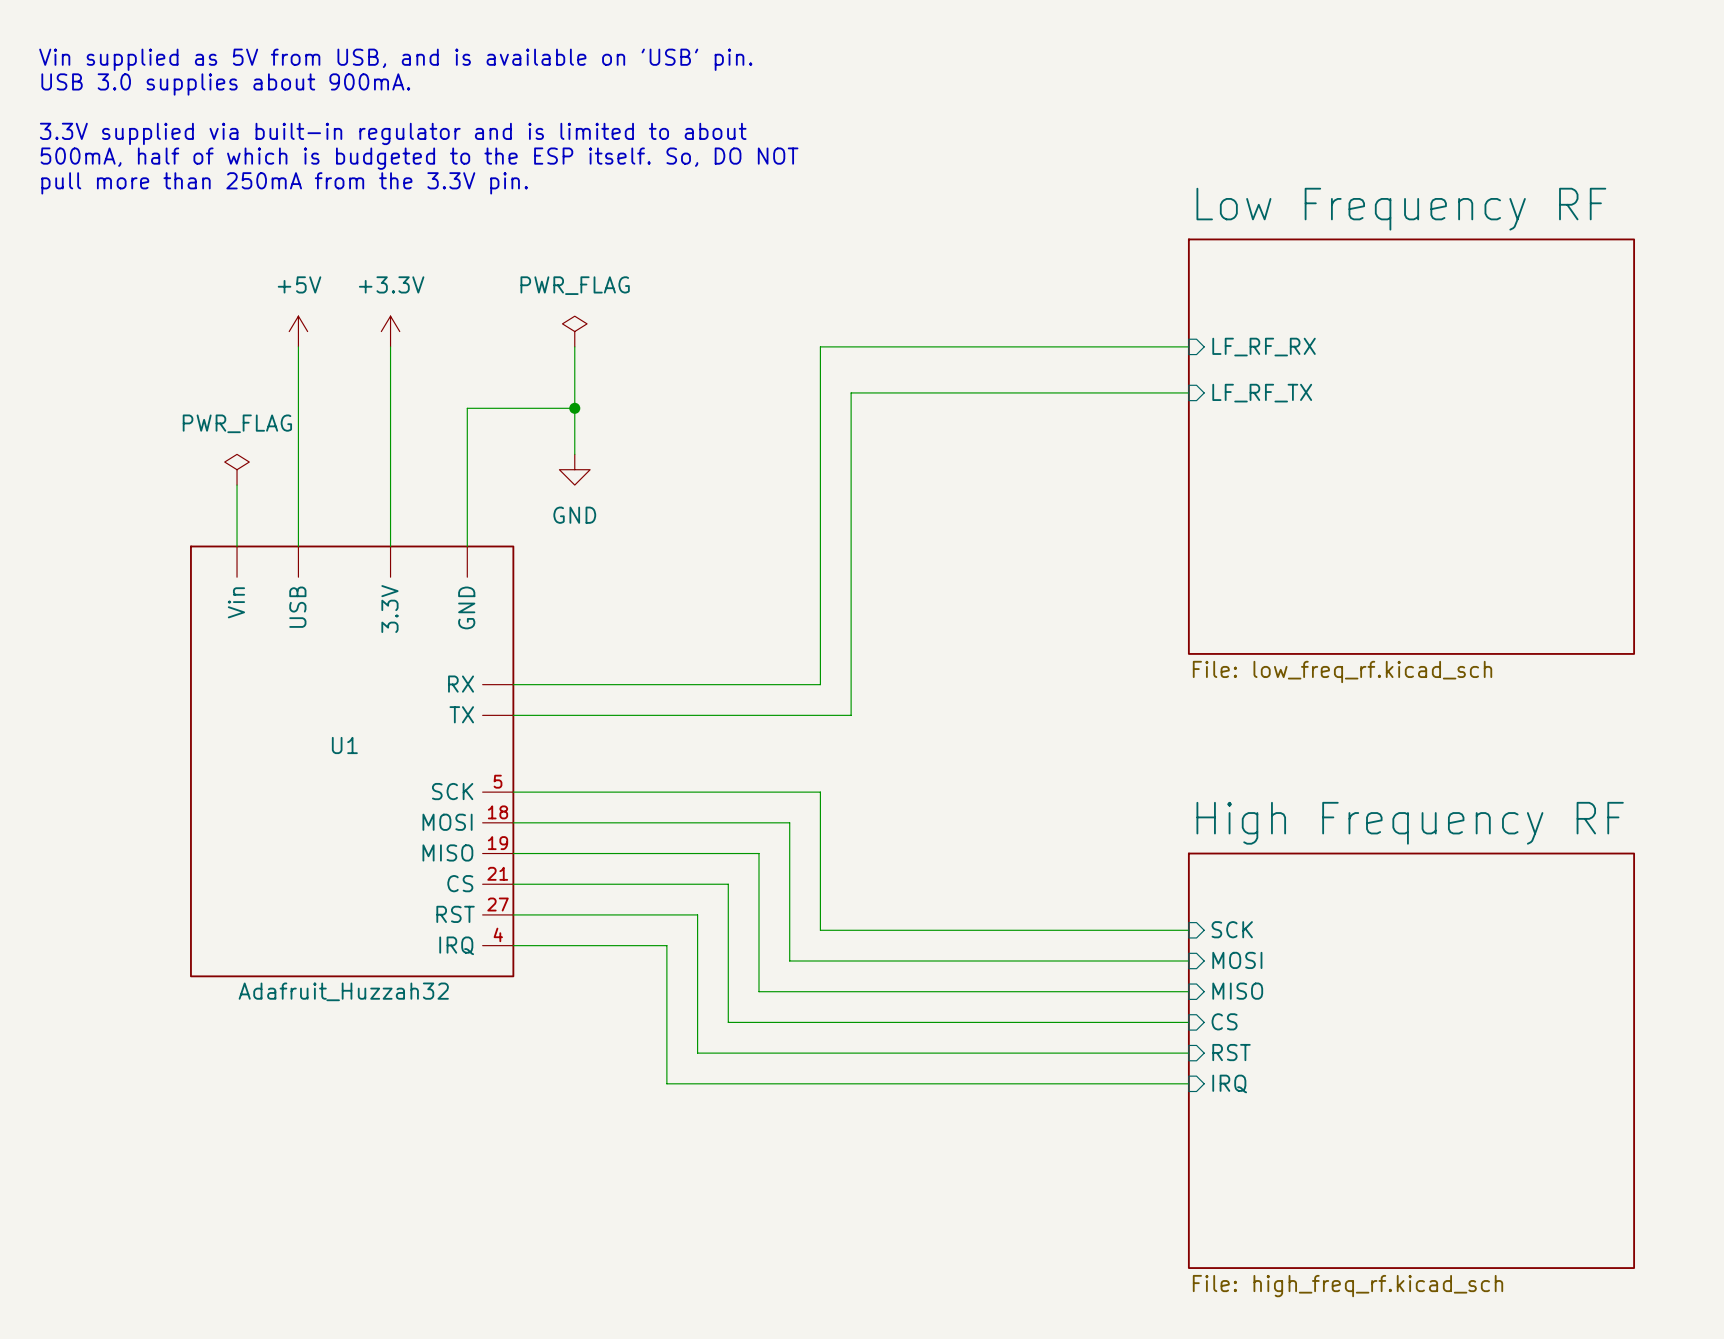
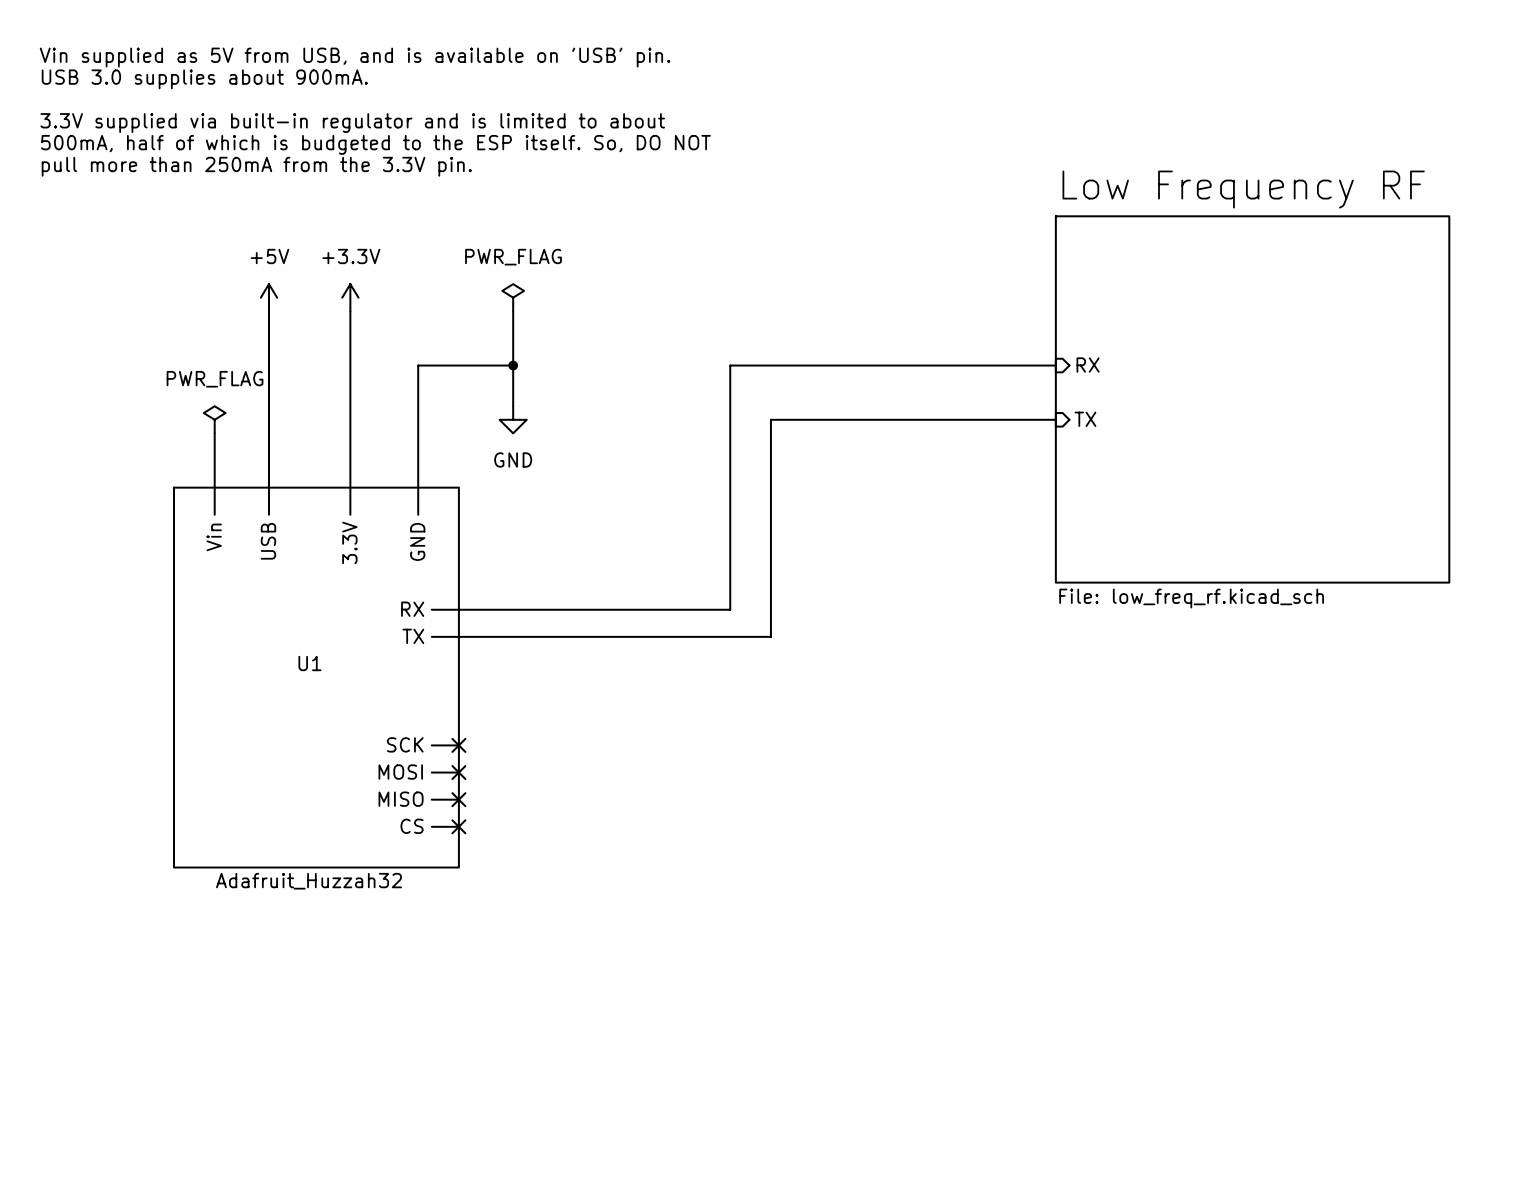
wire: (1188, 346) (820, 346) (820, 408) -> (1055, 365) (730, 365)
sheet pin: LF_RF_RX (1264, 347) -> none
wire: (1188, 392) (851, 392) (851, 715) -> (1055, 419) (770, 419) (770, 636) (757, 636)
sheet pin: LF_RF_TX (1262, 393) -> none
sheet pin: none -> RX (1088, 365)
sheet pin: none -> TX (1085, 419)
U1 symbol: [190, 545, 515, 978] -> [173, 486, 460, 869]
wire: (513, 792) (820, 792) (820, 930) (1188, 930) -> none
wire: (513, 822) (789, 822) (789, 961) (1188, 961) -> none
no-connect mark: none -> (458, 745)
wire: (513, 853) (759, 853) (759, 991) (1188, 991) -> none
no-connect mark: none -> (458, 772)
wire: (513, 884) (728, 884) (728, 1022) (1188, 1022) -> none
no-connect mark: none -> (458, 799)
wire: (513, 914) (697, 914) (697, 1053) (1188, 1053) -> none
sheet pin: SCK (1232, 929) -> none
no-connect mark: none -> (458, 826)
wire: (513, 945) (666, 945) (666, 1083) (1188, 1083) -> none
sheet pin: MOSI (1237, 960) -> none
sheet pin: MISO (1237, 991) -> none
sheet pin: CS (1224, 1021) -> none
sheet pin: RST (1231, 1052) -> none
sheet High Frequency RF: File: high_freq_rf.kicad_sch (1411, 1060) -> none
sheet pin: IRQ (1229, 1083) -> none

